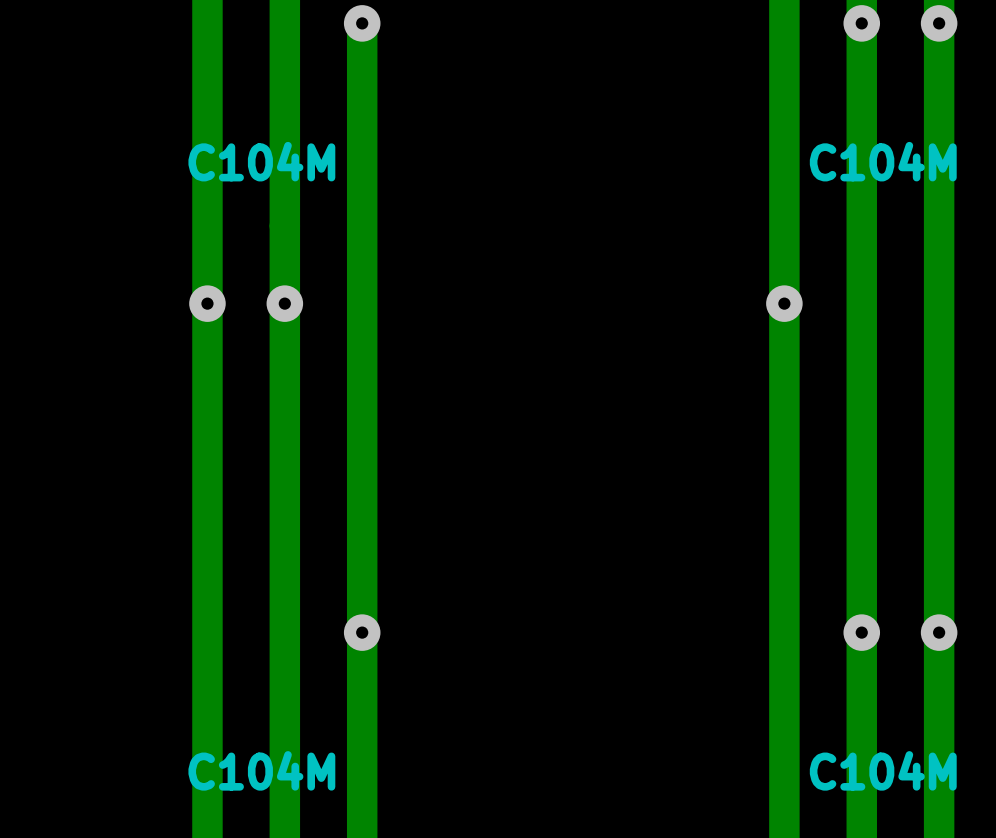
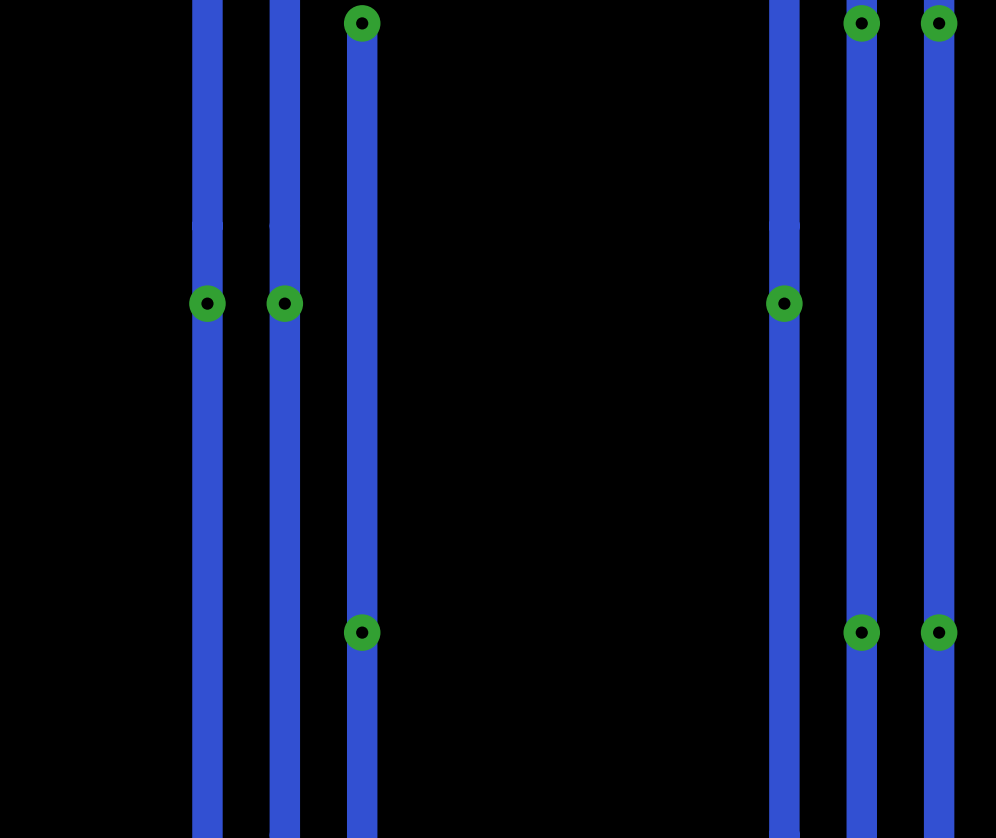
part: C104M (261, 161) -> none
part: C104M (883, 161) -> none
part: C104M (261, 770) -> none
part: C104M (883, 770) -> none

